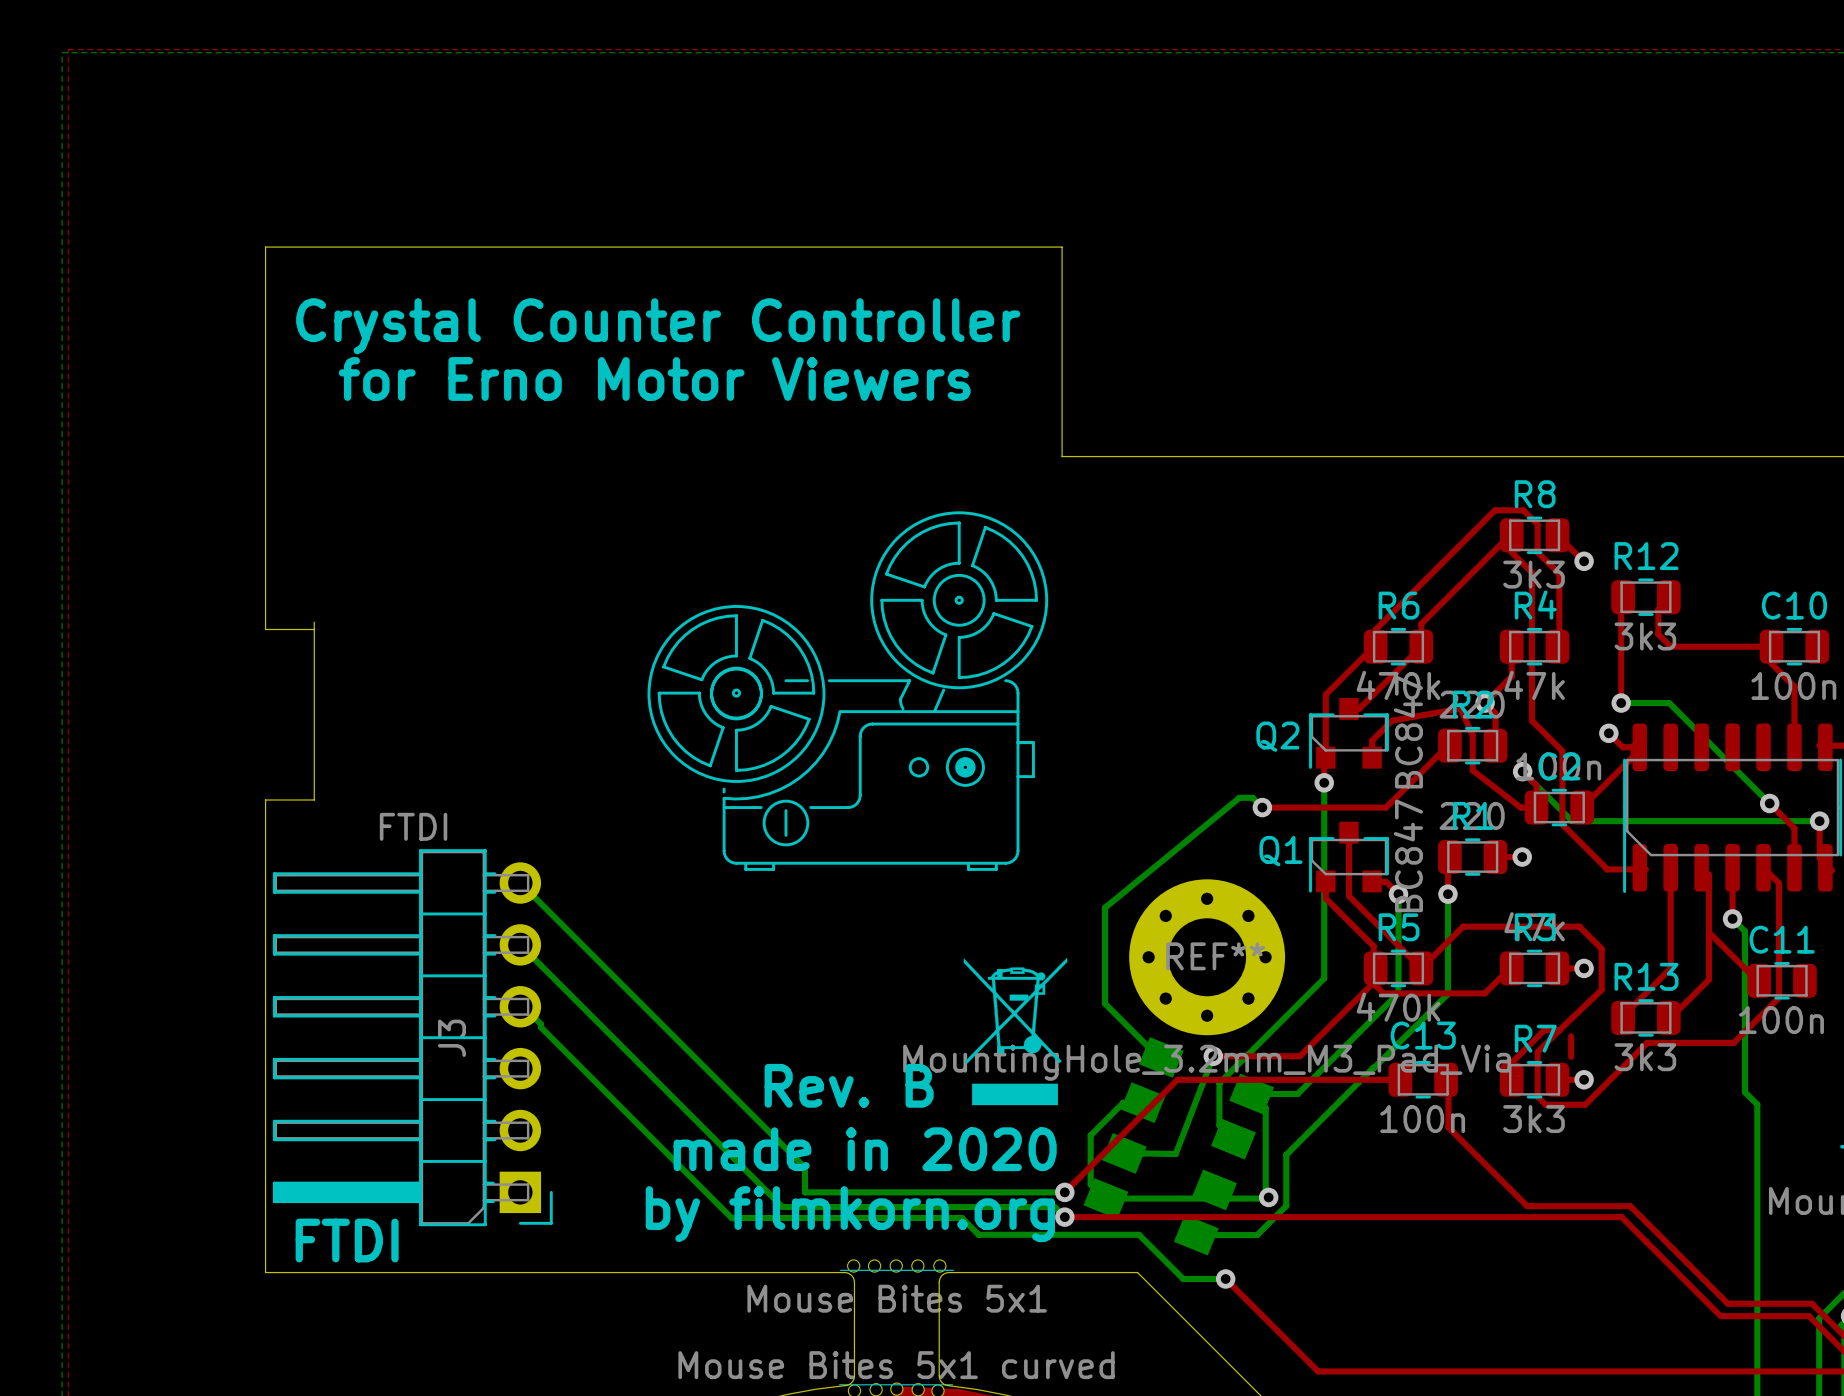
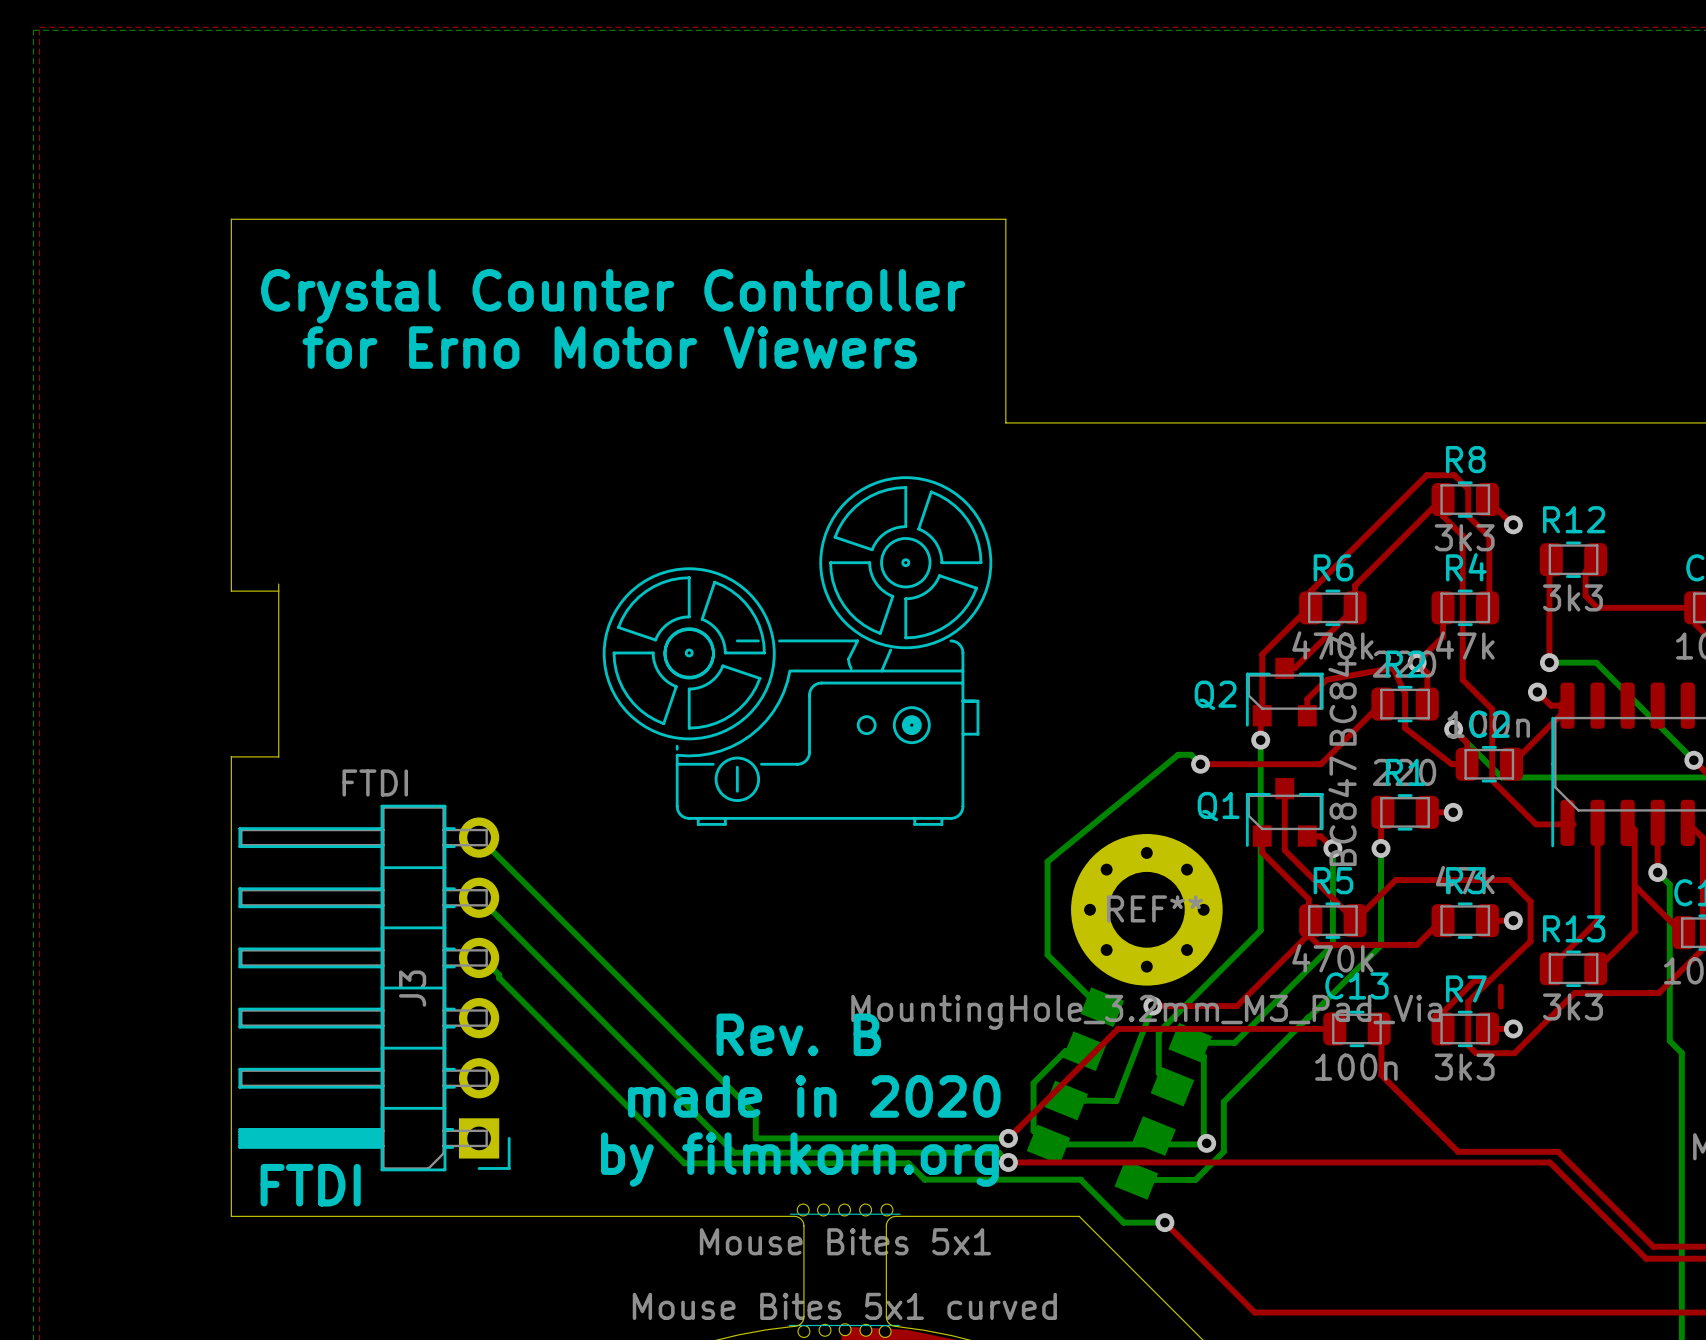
drawing: [963, 957, 1068, 1106] -> none

